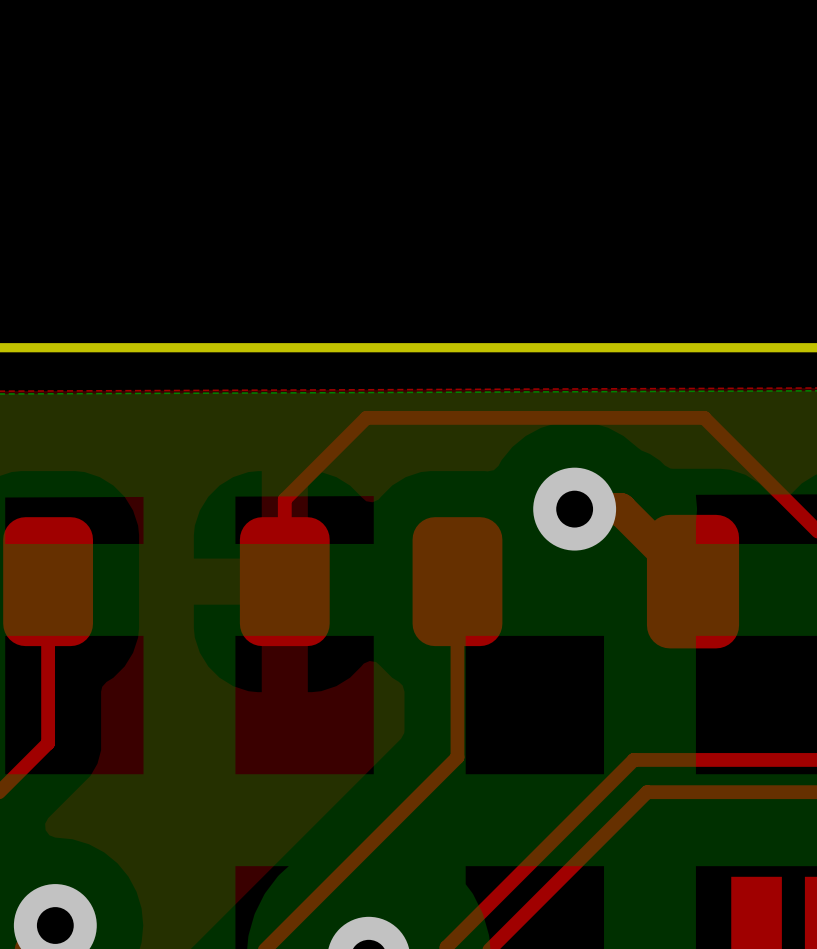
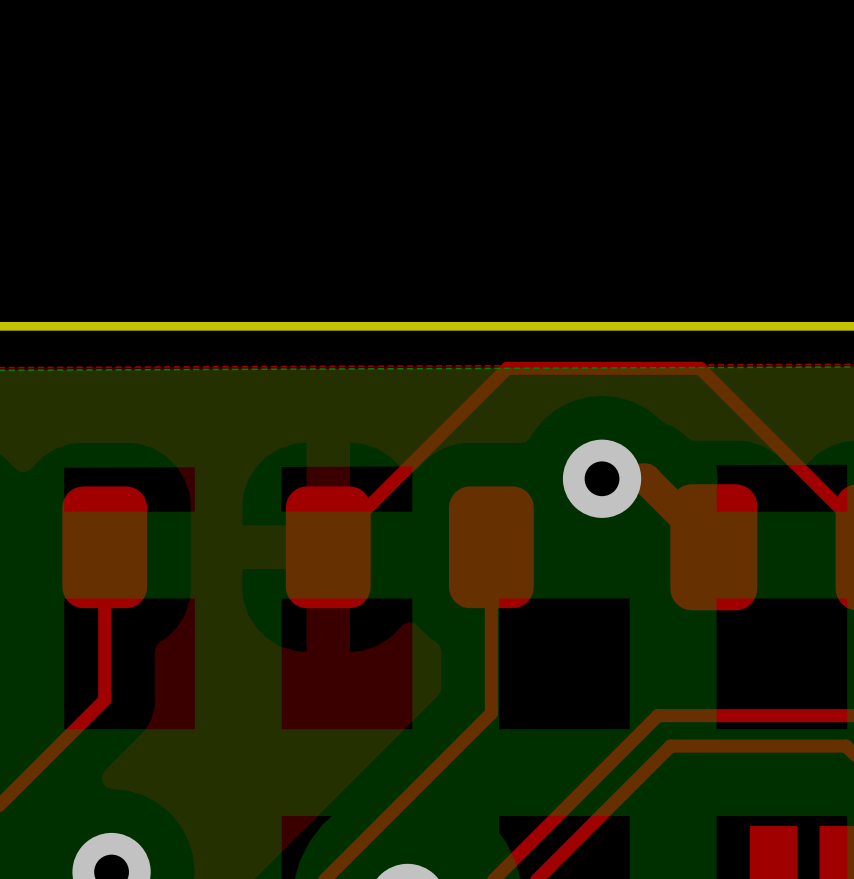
top track: (704, 417) (366, 417) (284, 499) (284, 581) -> (724, 392) (700, 368) (507, 368) (328, 547)

